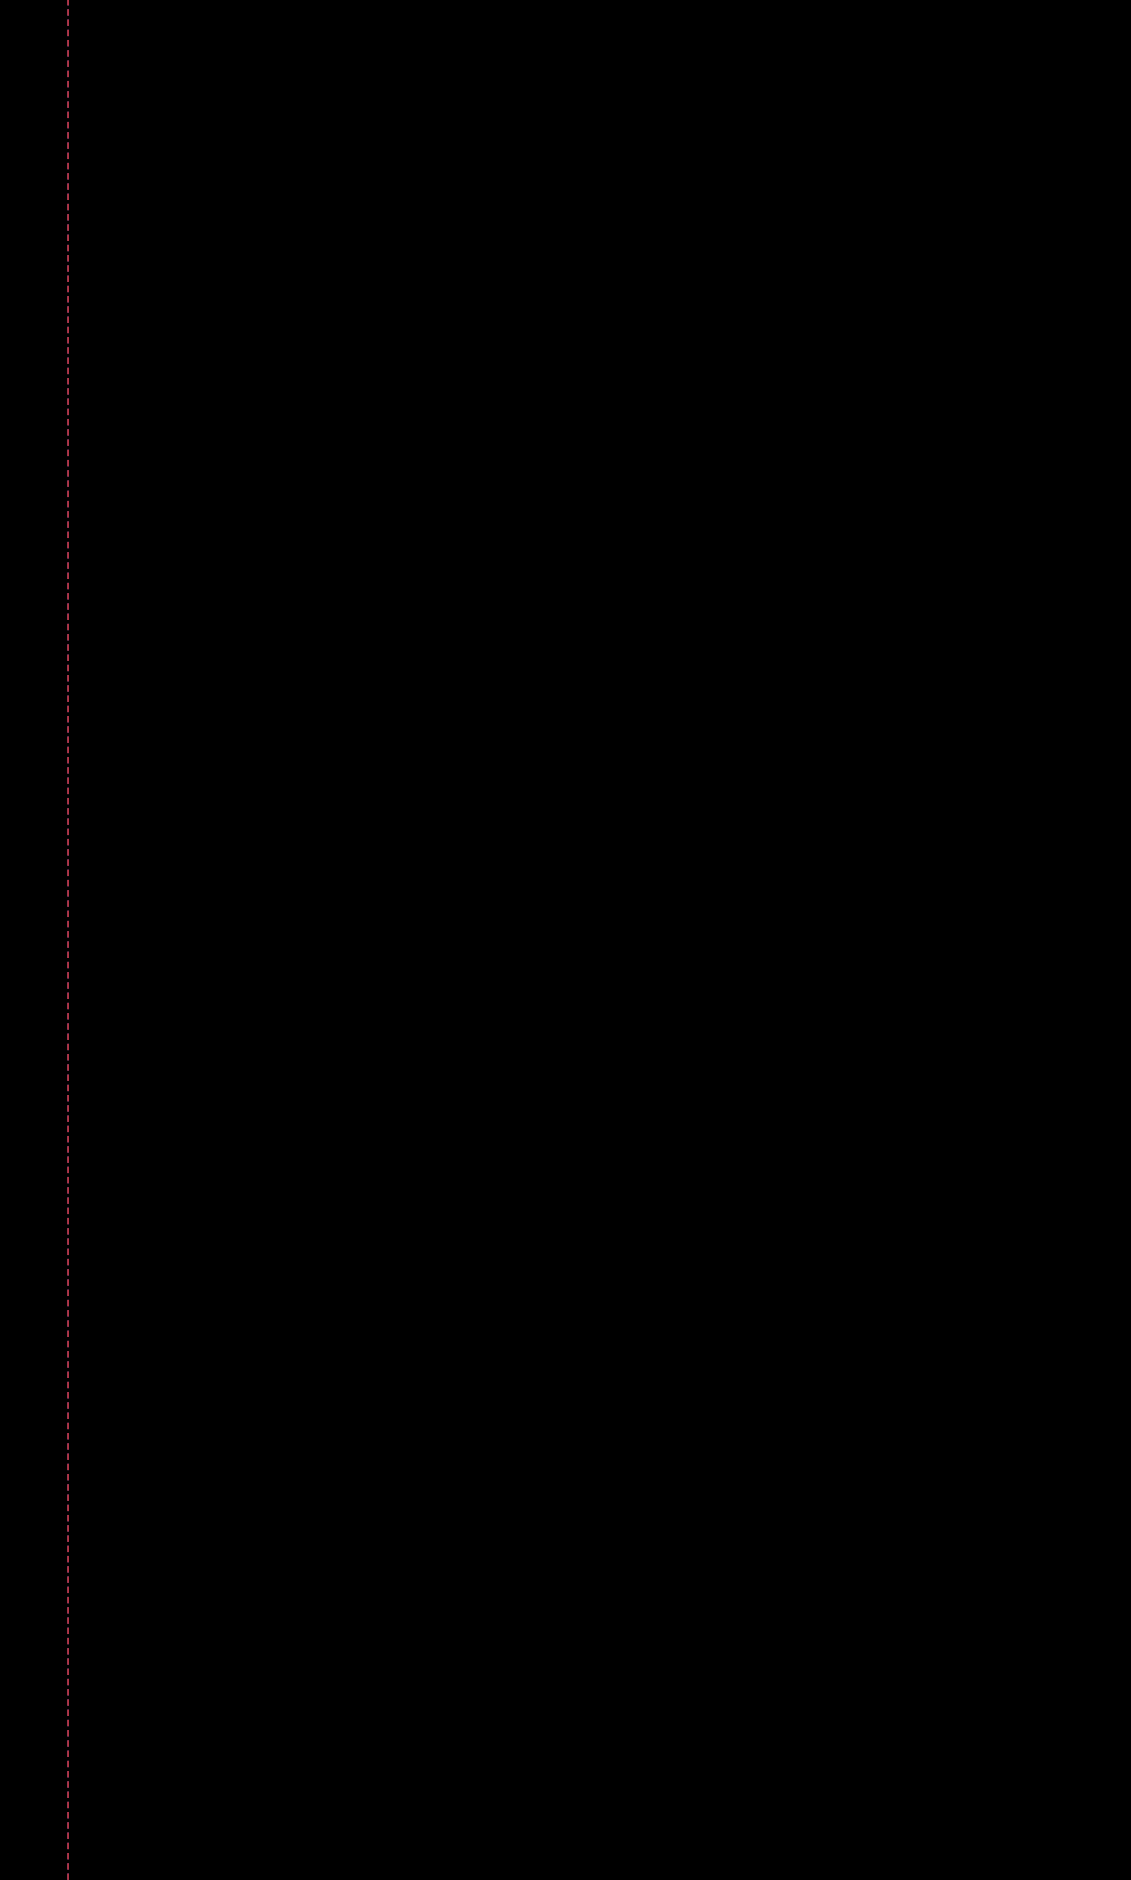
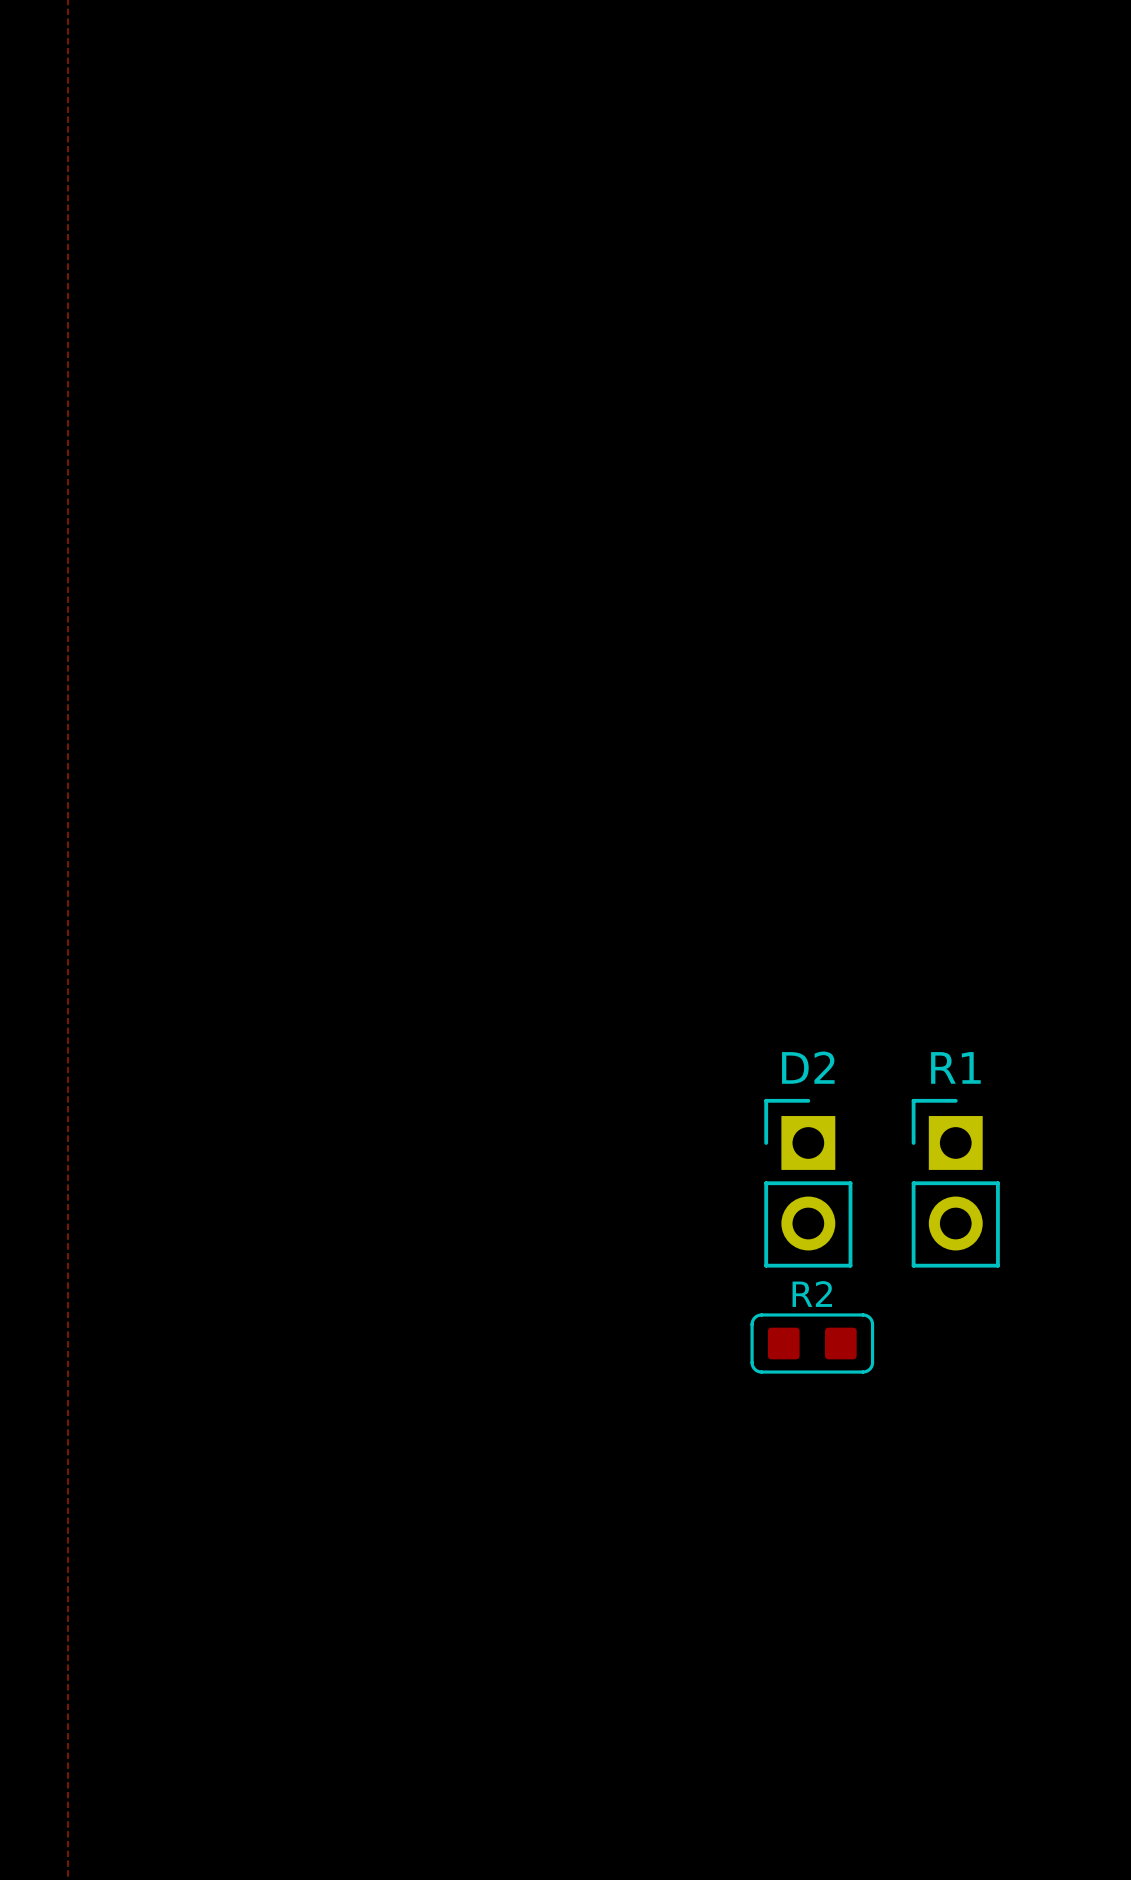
D2: none -> (808, 1183)
R1: none -> (955, 1183)
R2: none -> (812, 1343)

